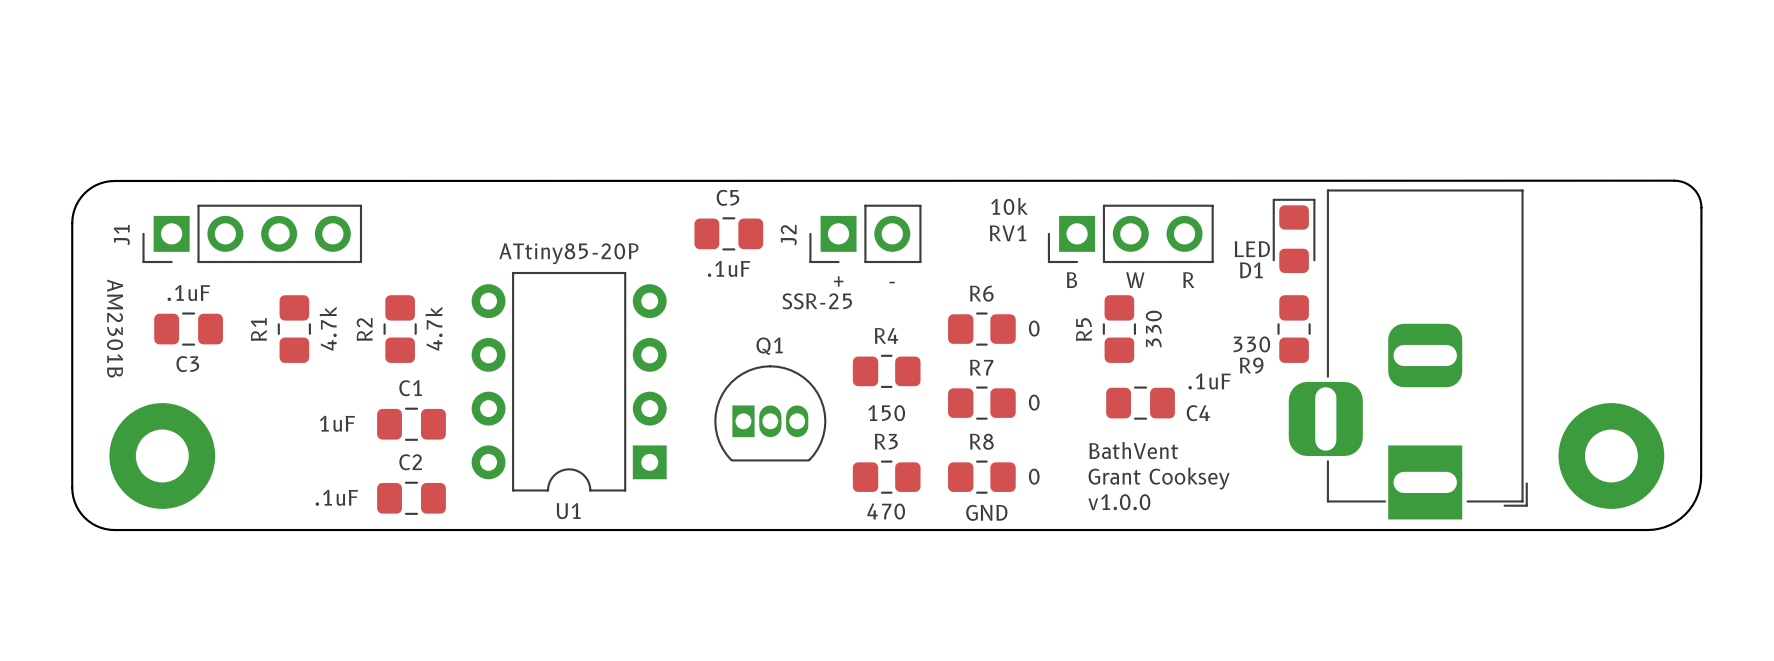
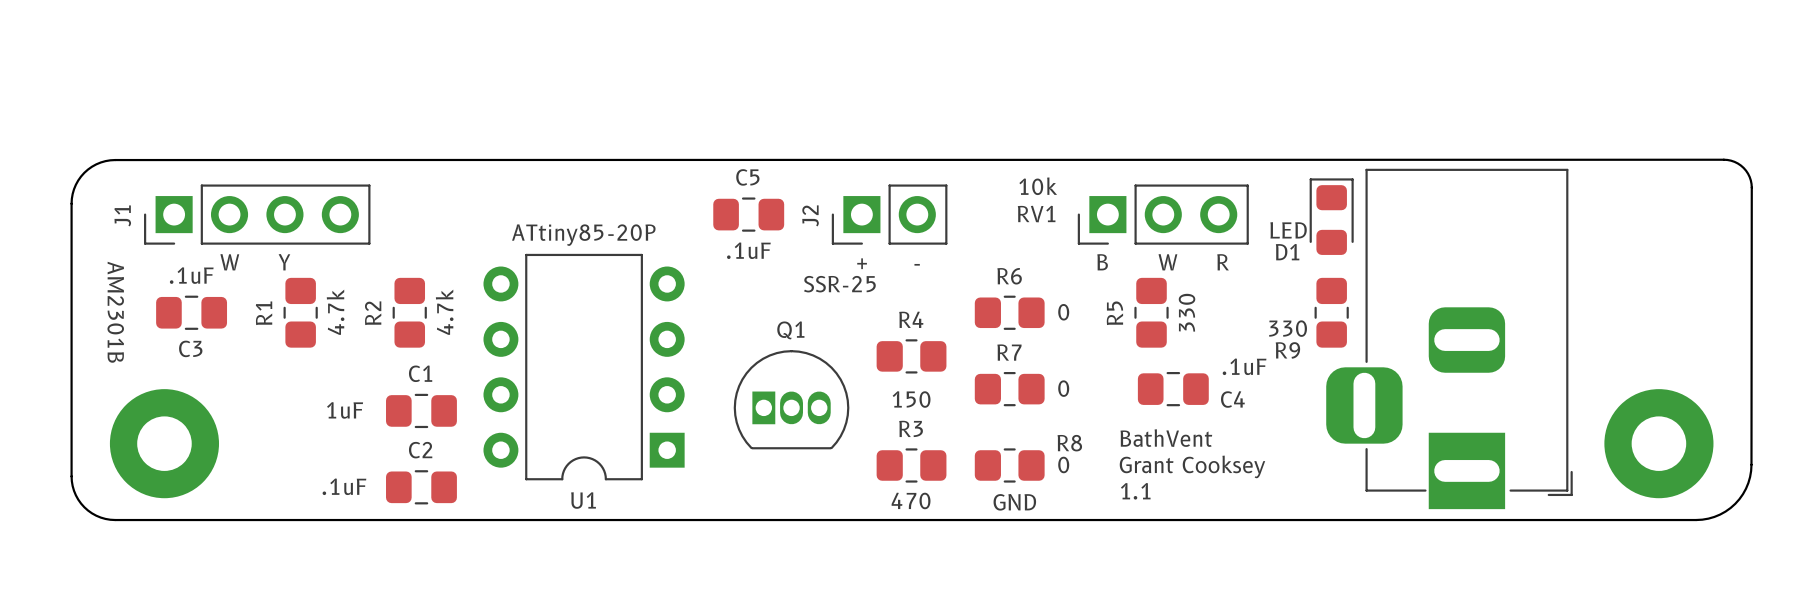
text: none -> W (229, 262)
text: none -> Y (284, 262)
R8 name position: R8 (981, 441) -> R8 (1069, 443)
text: v1.0.0 (1119, 502) -> 1.1 (1135, 491)

